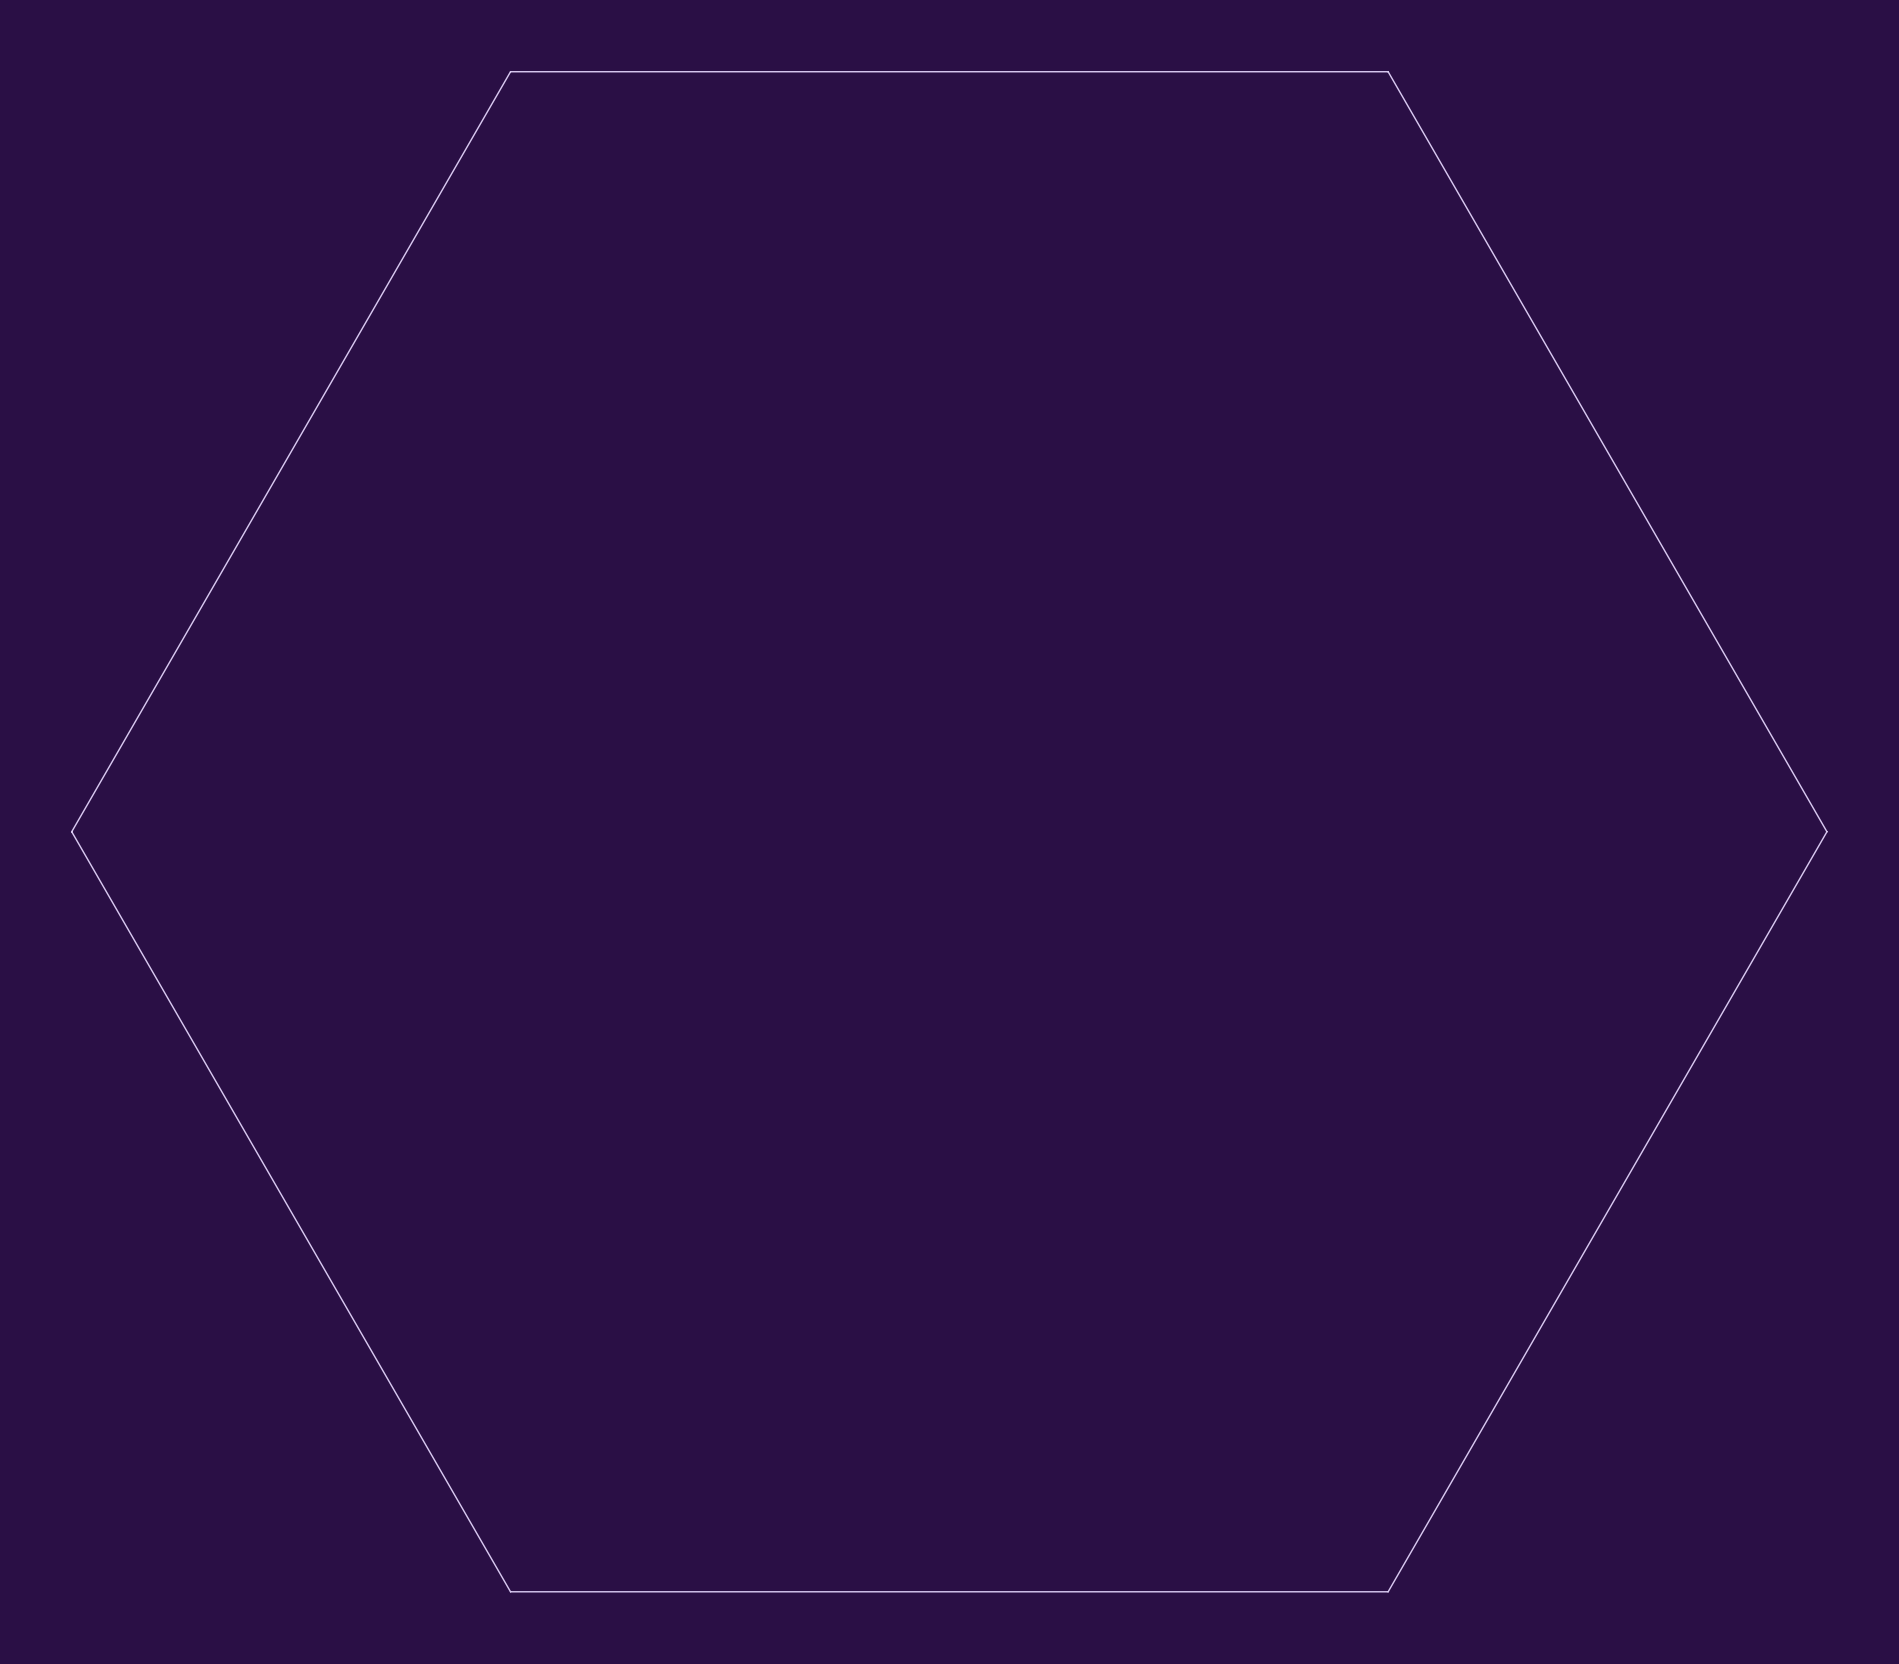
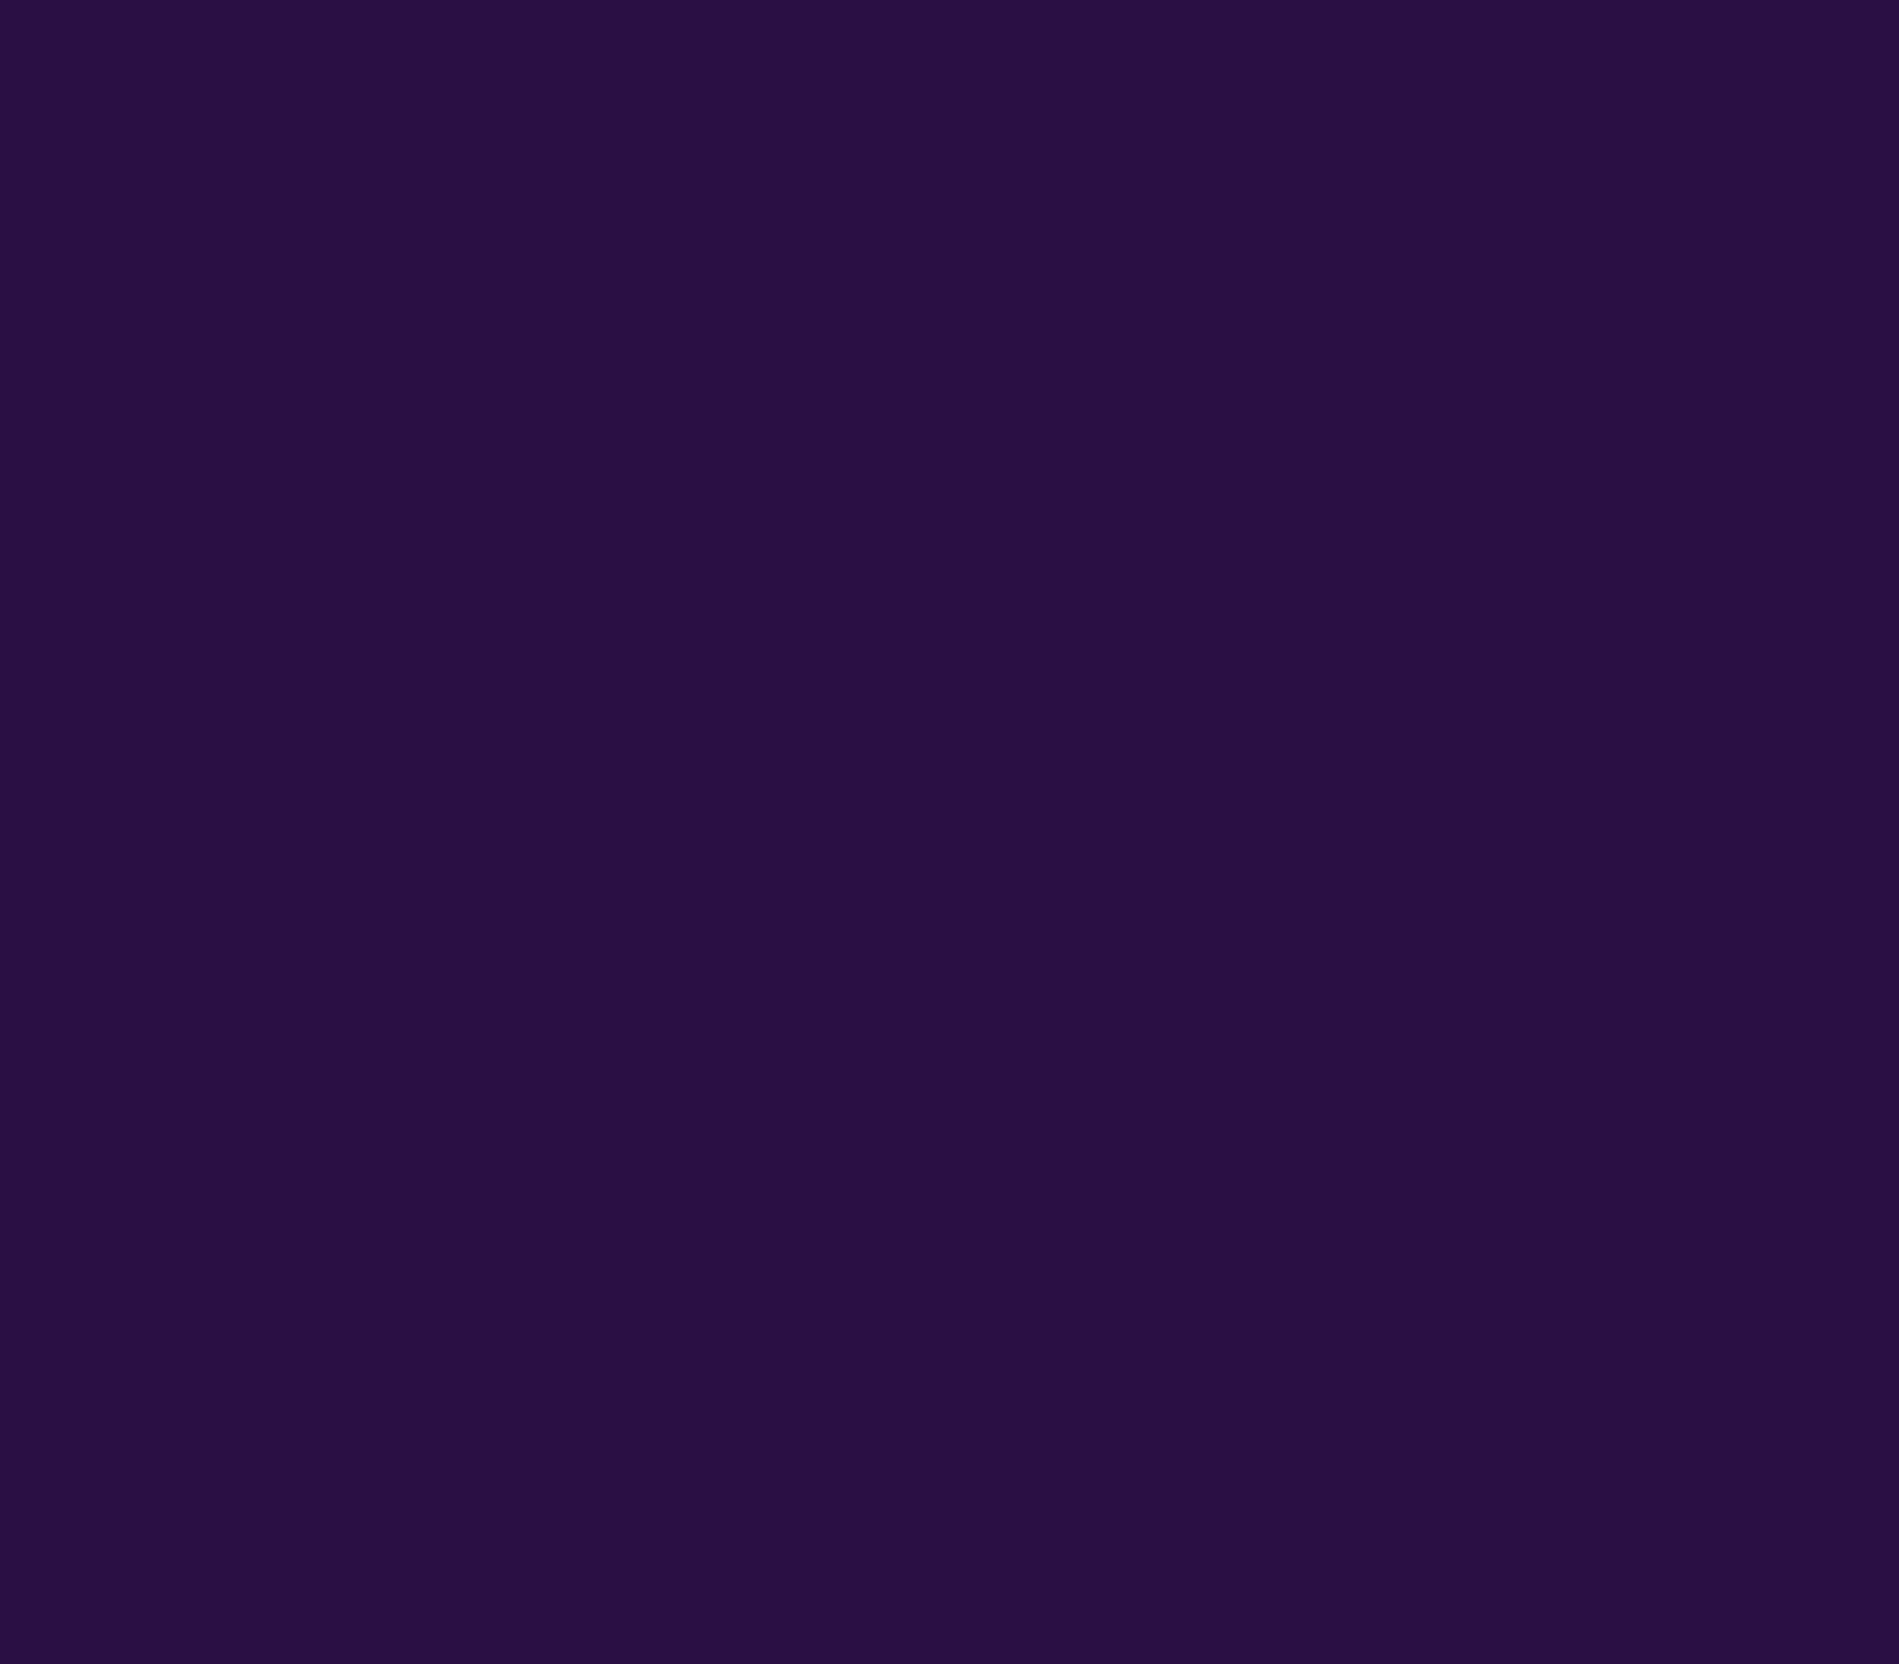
board edge: (1388, 71) (1826, 831) (1388, 1591) (510, 1591) (71, 831) (510, 71) (1388, 71) -> none

